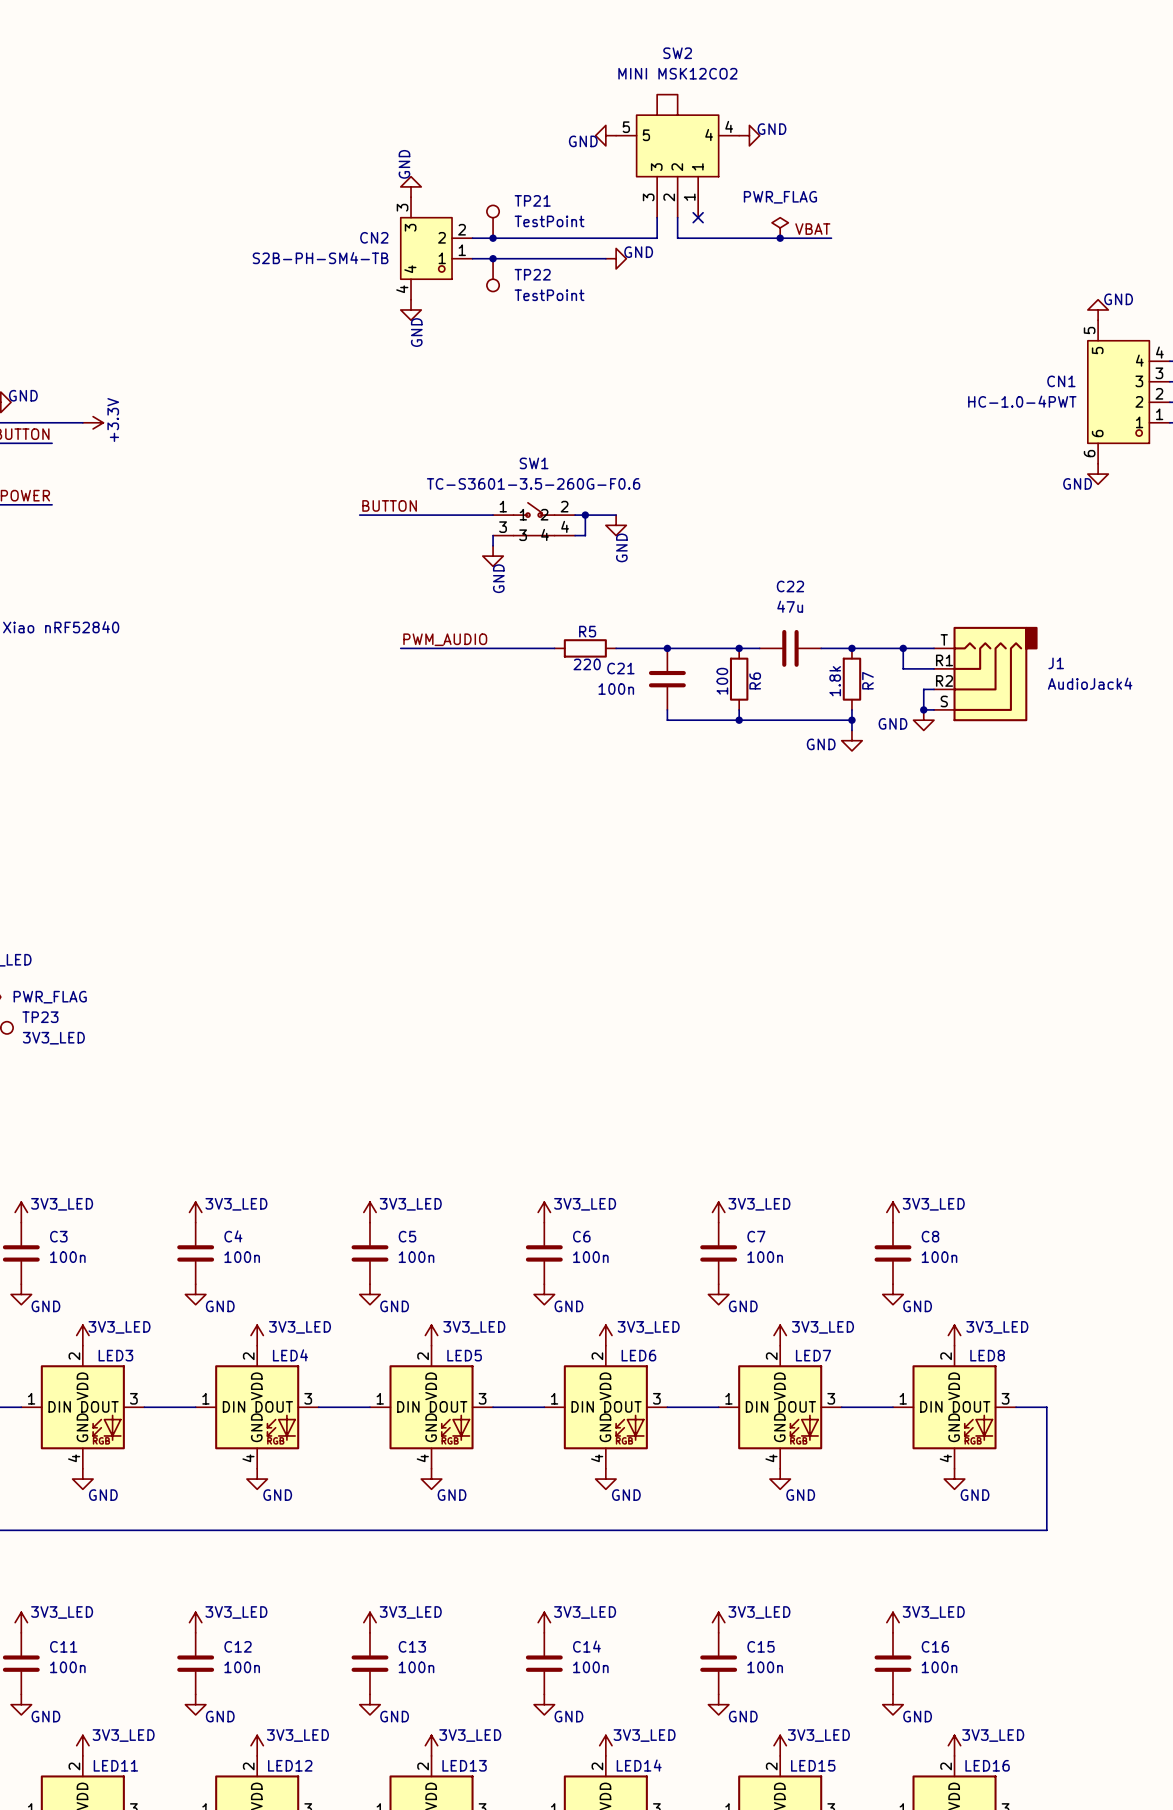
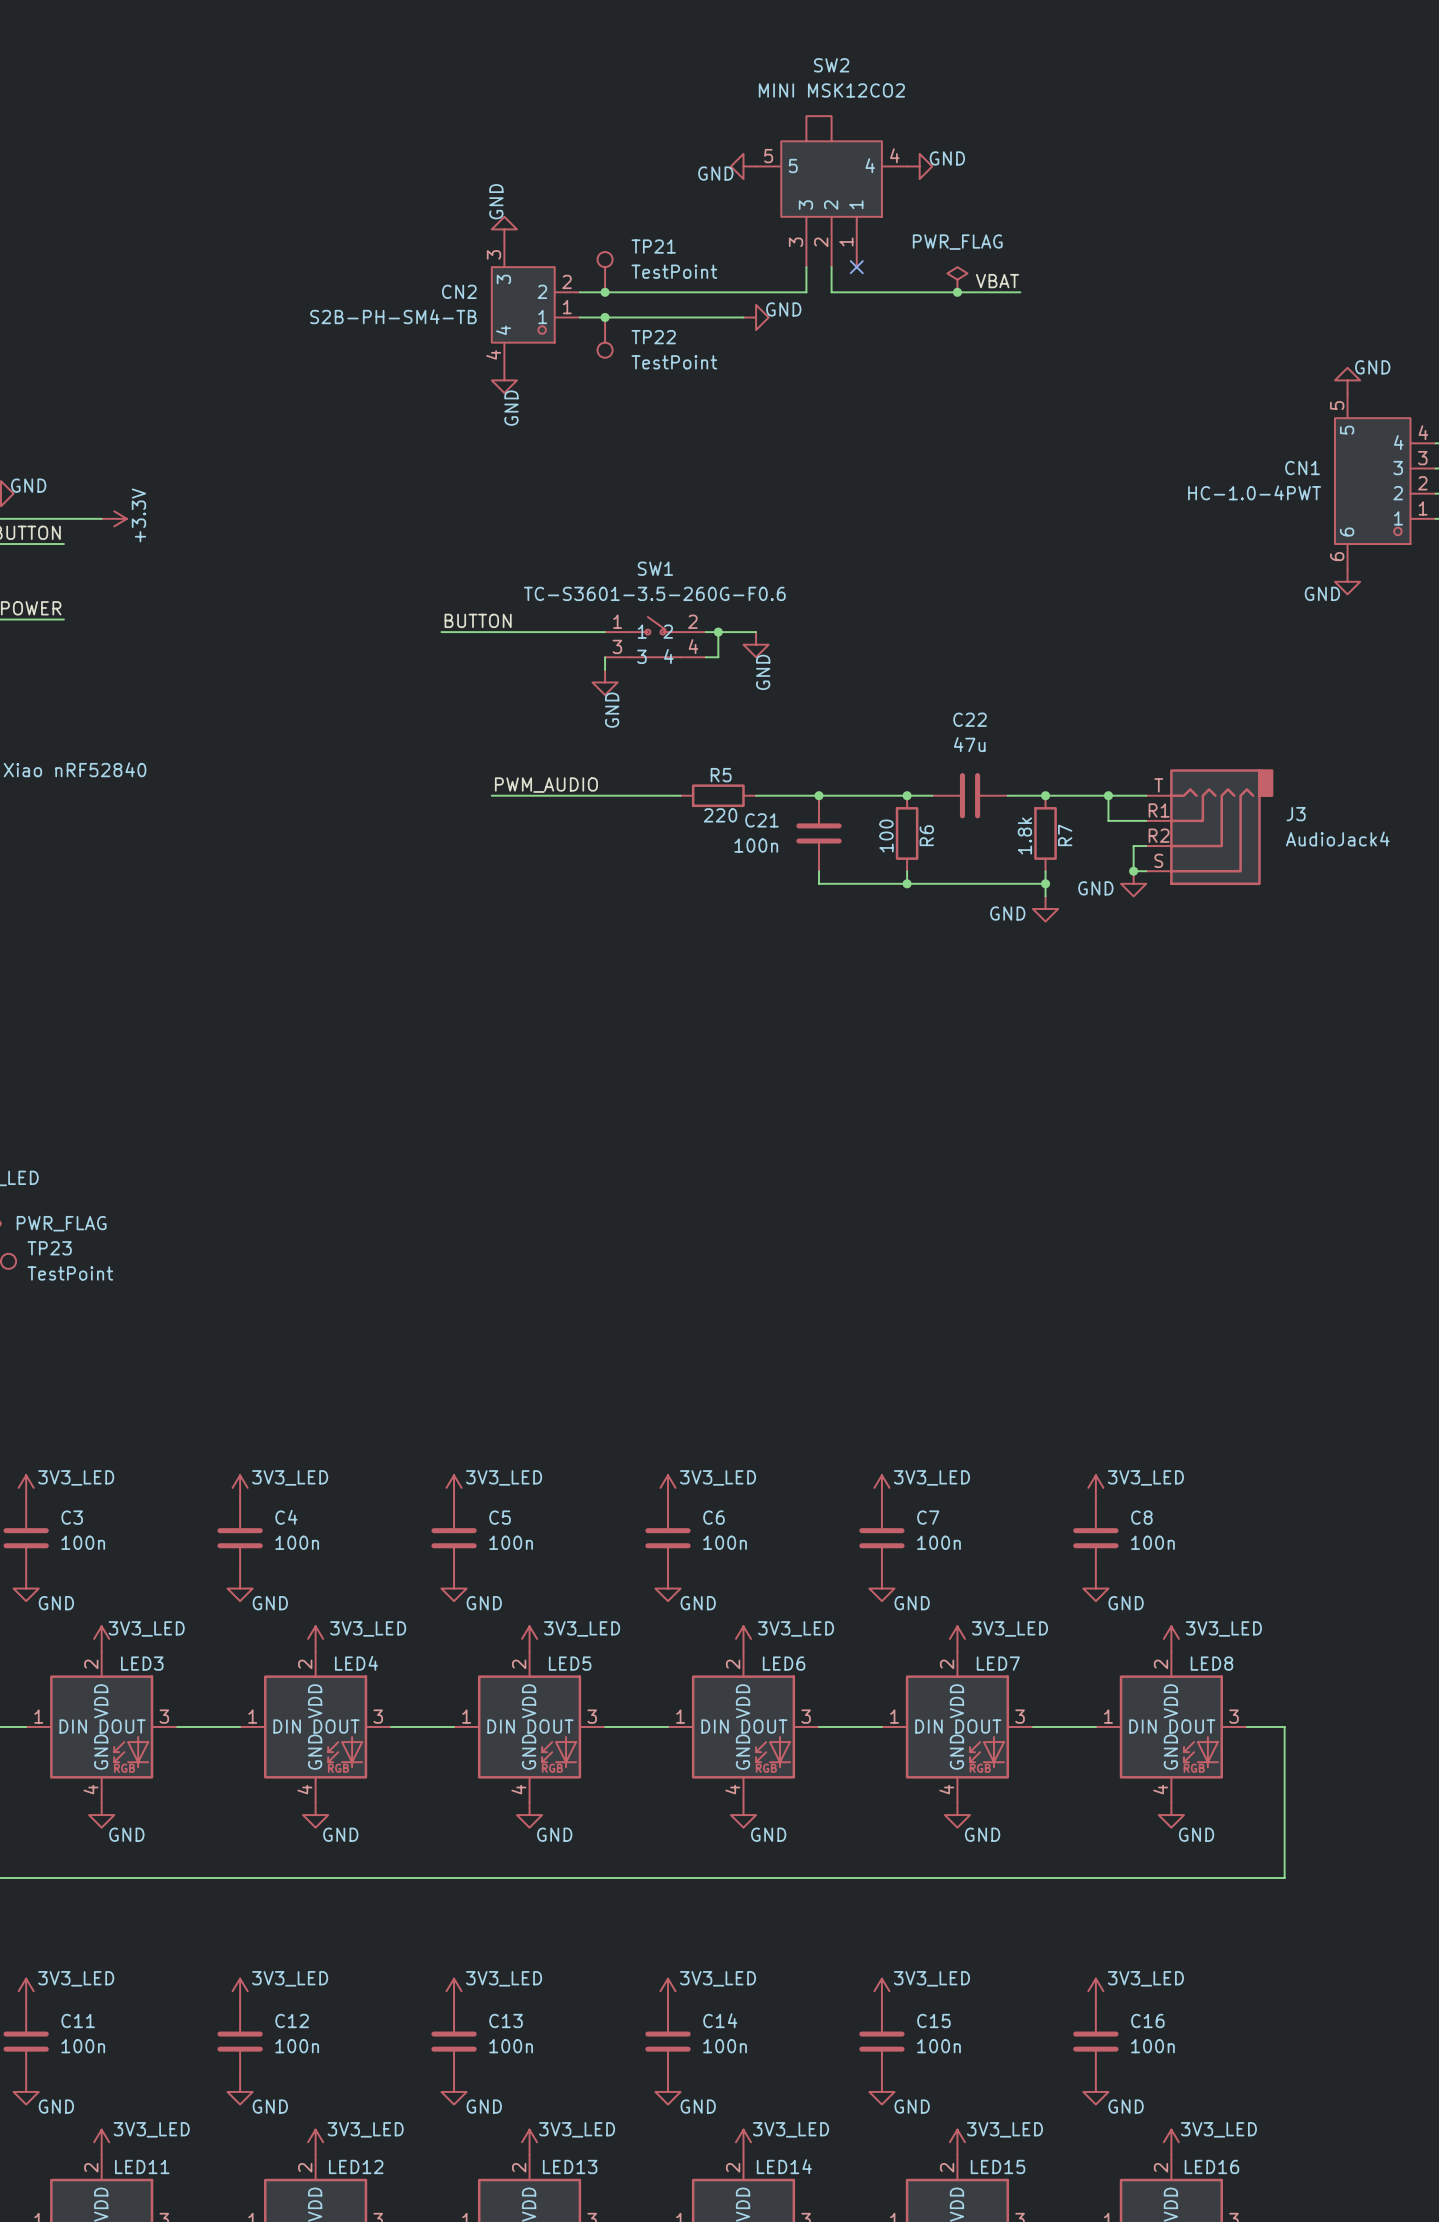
J1 name: J1 (1056, 663) -> J3 (1296, 814)
TP23 value: 3V3_LED (53, 1038) -> TestPoint (70, 1273)

